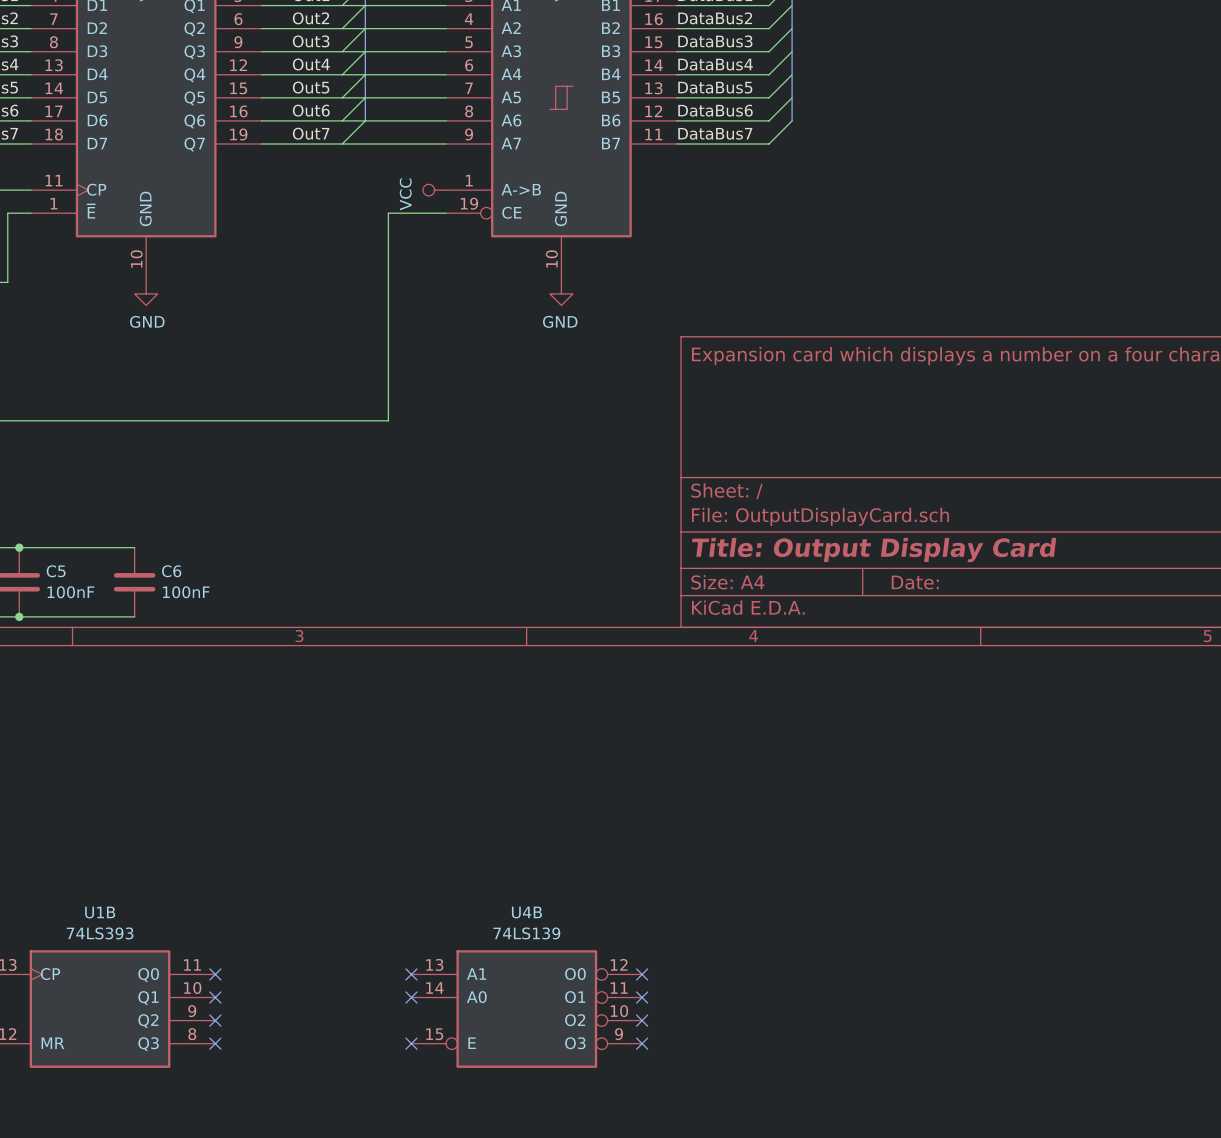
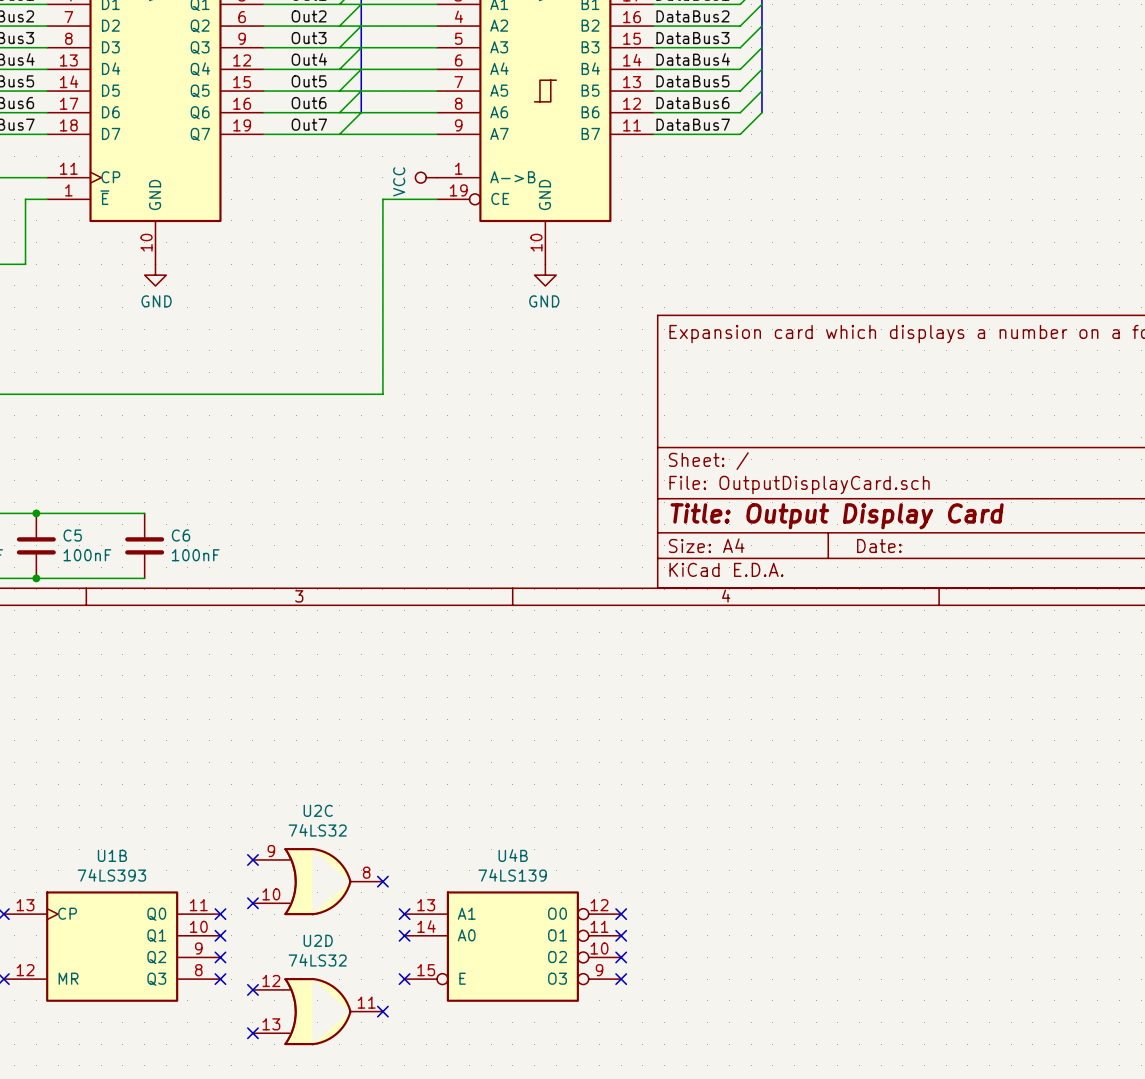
no-connect mark: none -> (252, 859)
U2C: none -> 74LS32 (317, 881)
no-connect mark: none -> (382, 881)
no-connect mark: none -> (252, 903)
no-connect mark: none -> (252, 989)
U2D: none -> 74LS32 (317, 1011)
no-connect mark: none -> (382, 1011)
no-connect mark: none -> (252, 1033)

